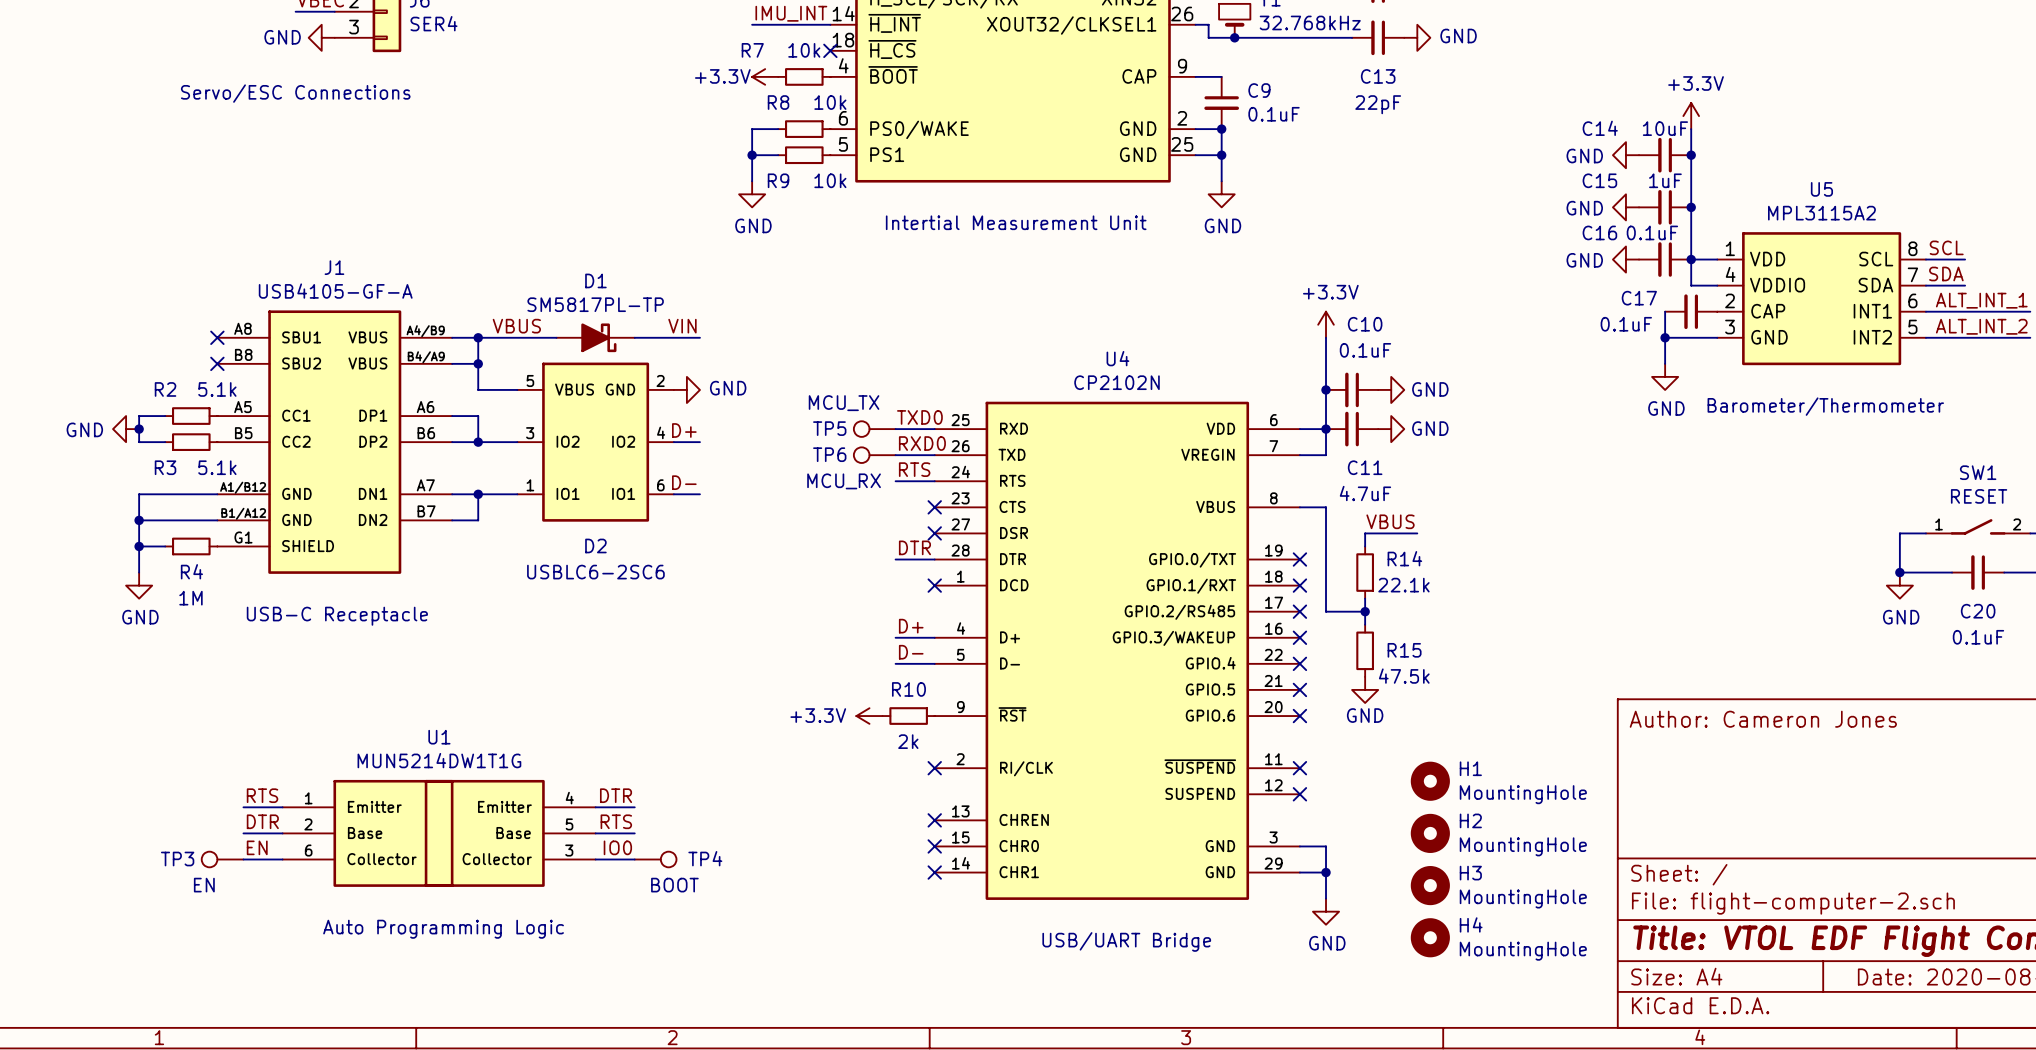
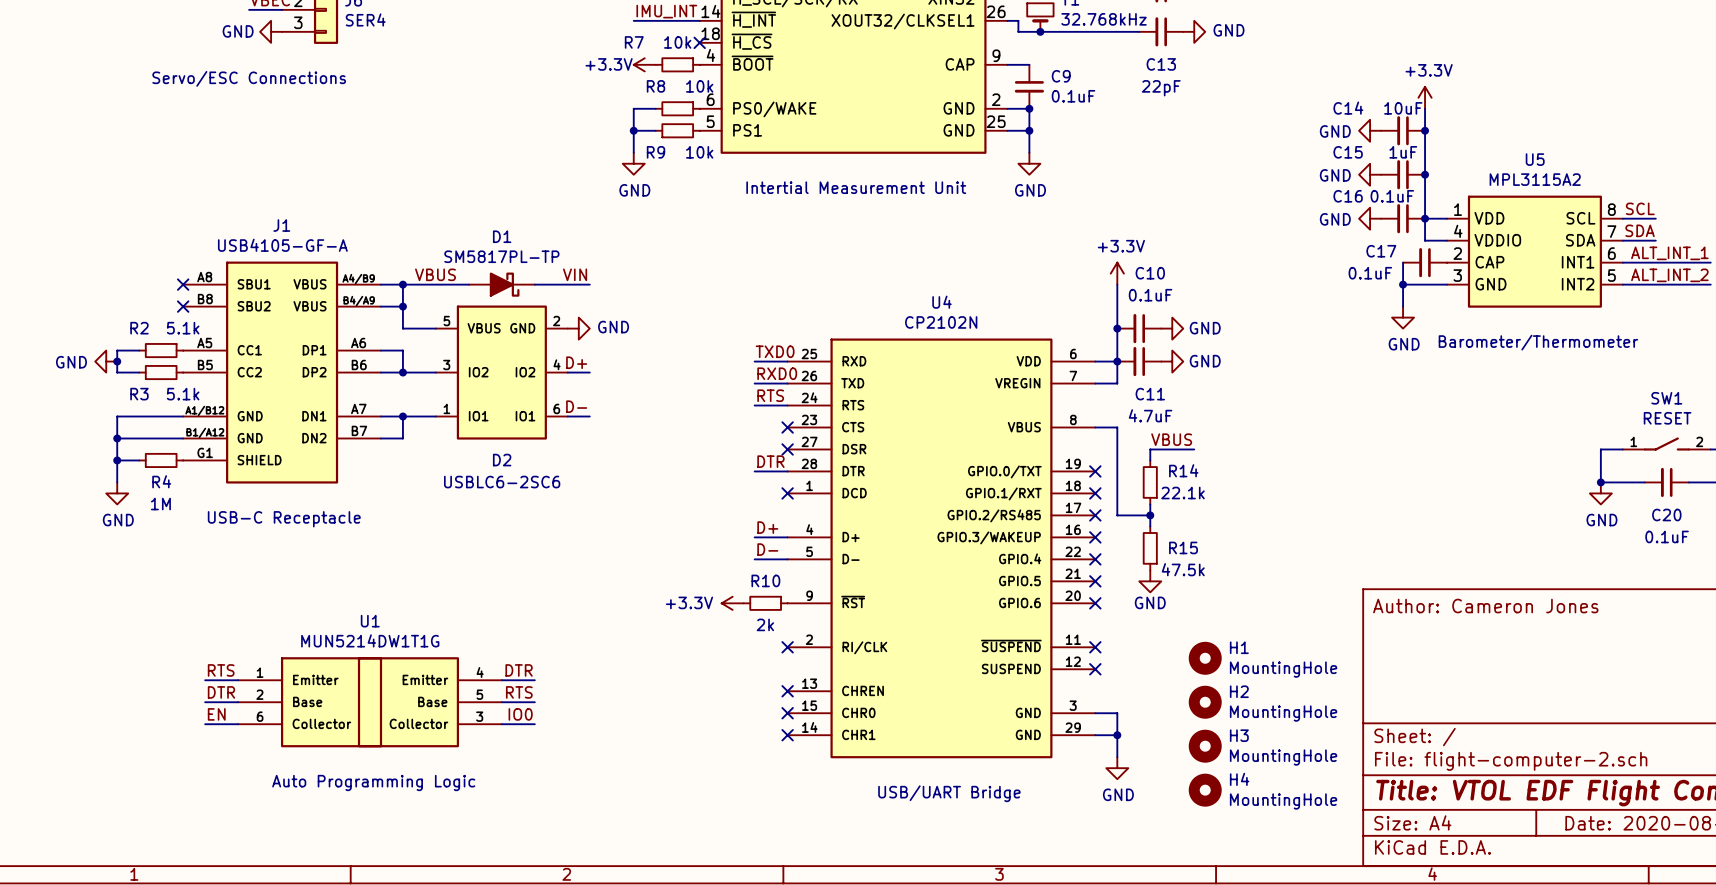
TP5: MCU_TX (874, 429) -> none
TP6: MCU_RX (874, 455) -> none
TP3: EN (222, 859) -> none
TP4: BOOT (655, 859) -> none

